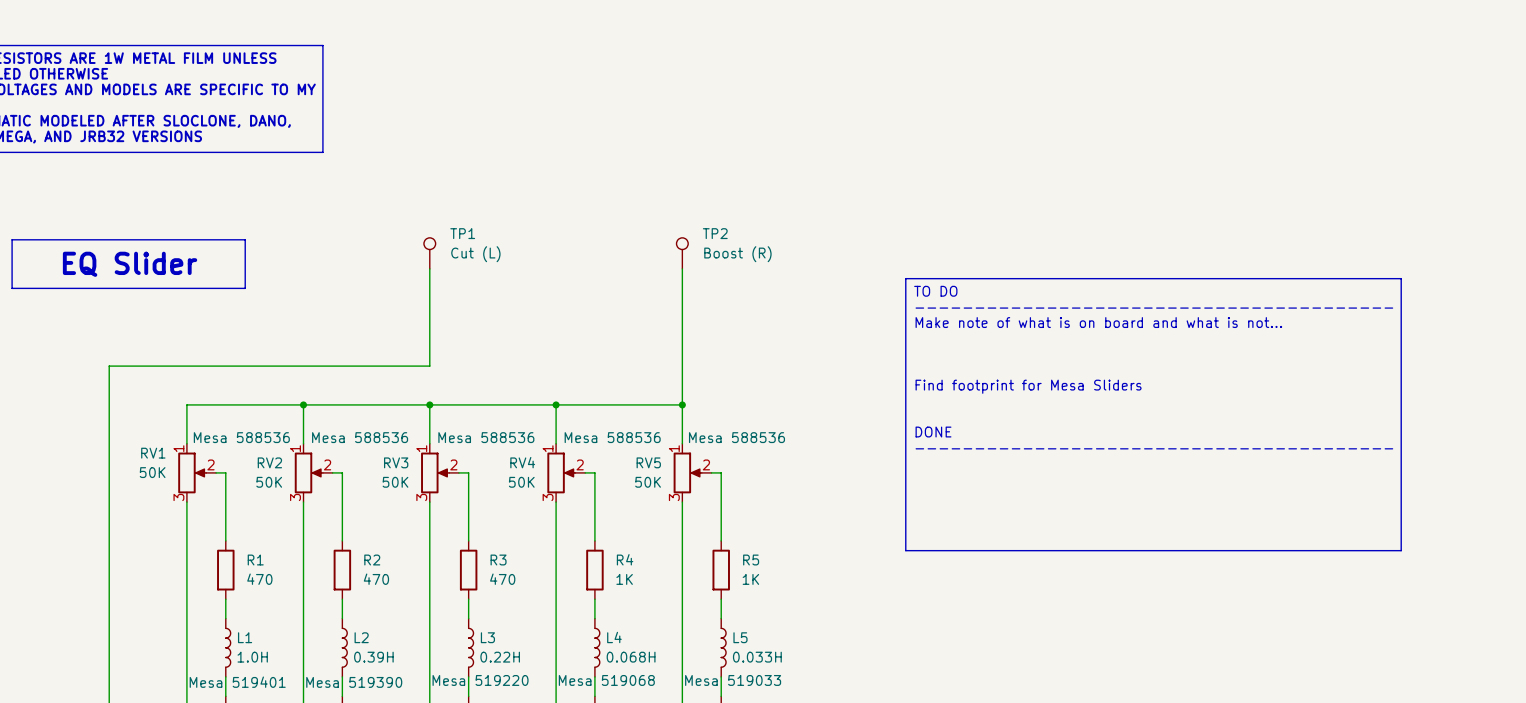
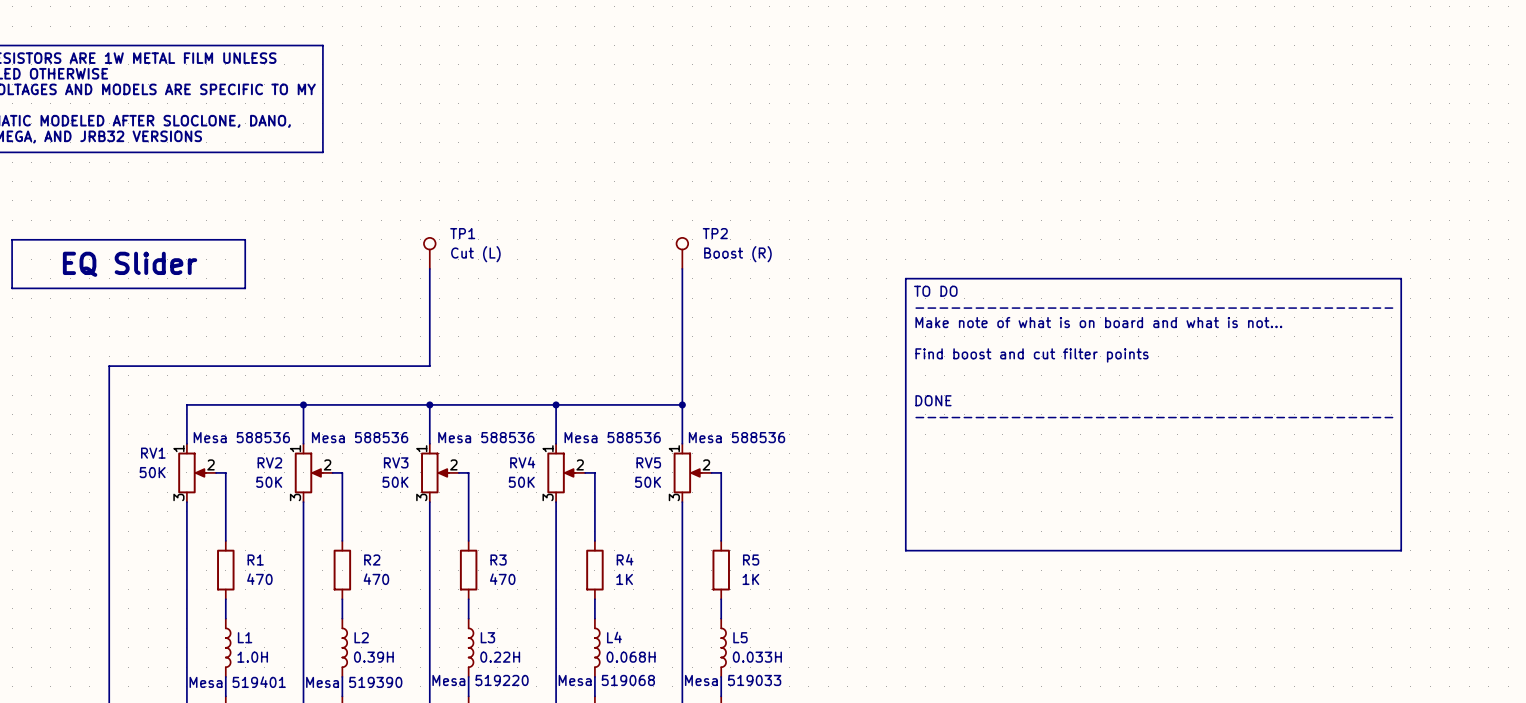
text: none -> Find boost and cut filter points (1032, 355)
text: Find footprint for Mesa Sliders (1028, 386) -> none
text position: DONE (933, 432) -> DONE (933, 400)
text position: ---------------------------------------- (1154, 448) -> ---------------------------------------- (1154, 417)

